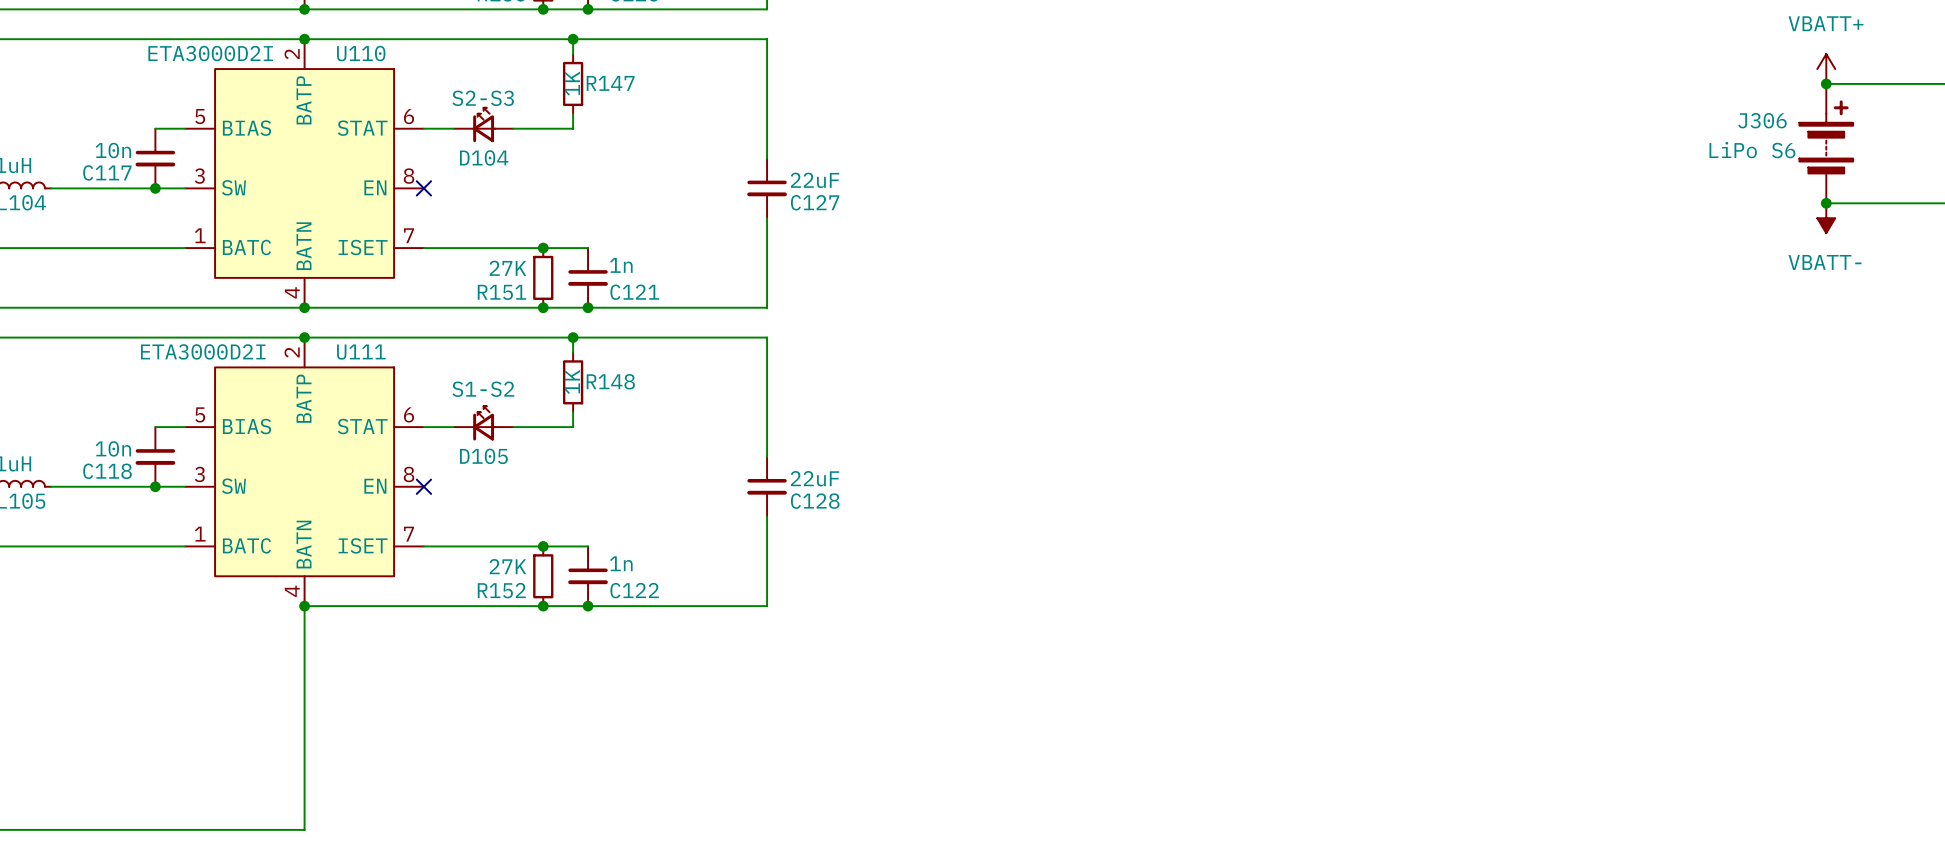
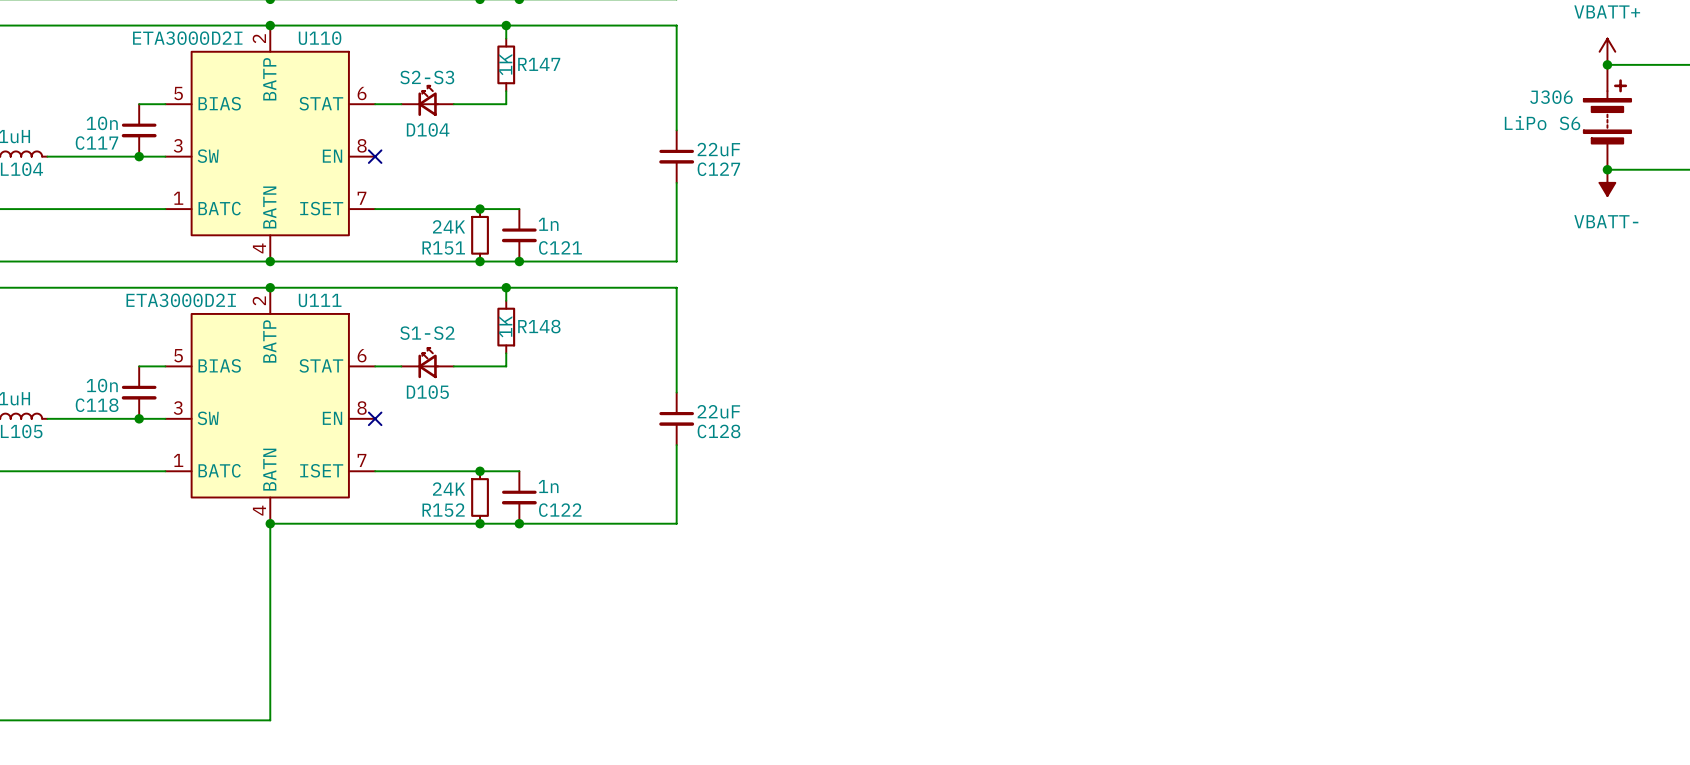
R151 value: 27K (507, 268) -> 24K (448, 226)
R152 value: 27K (507, 566) -> 24K (448, 489)

